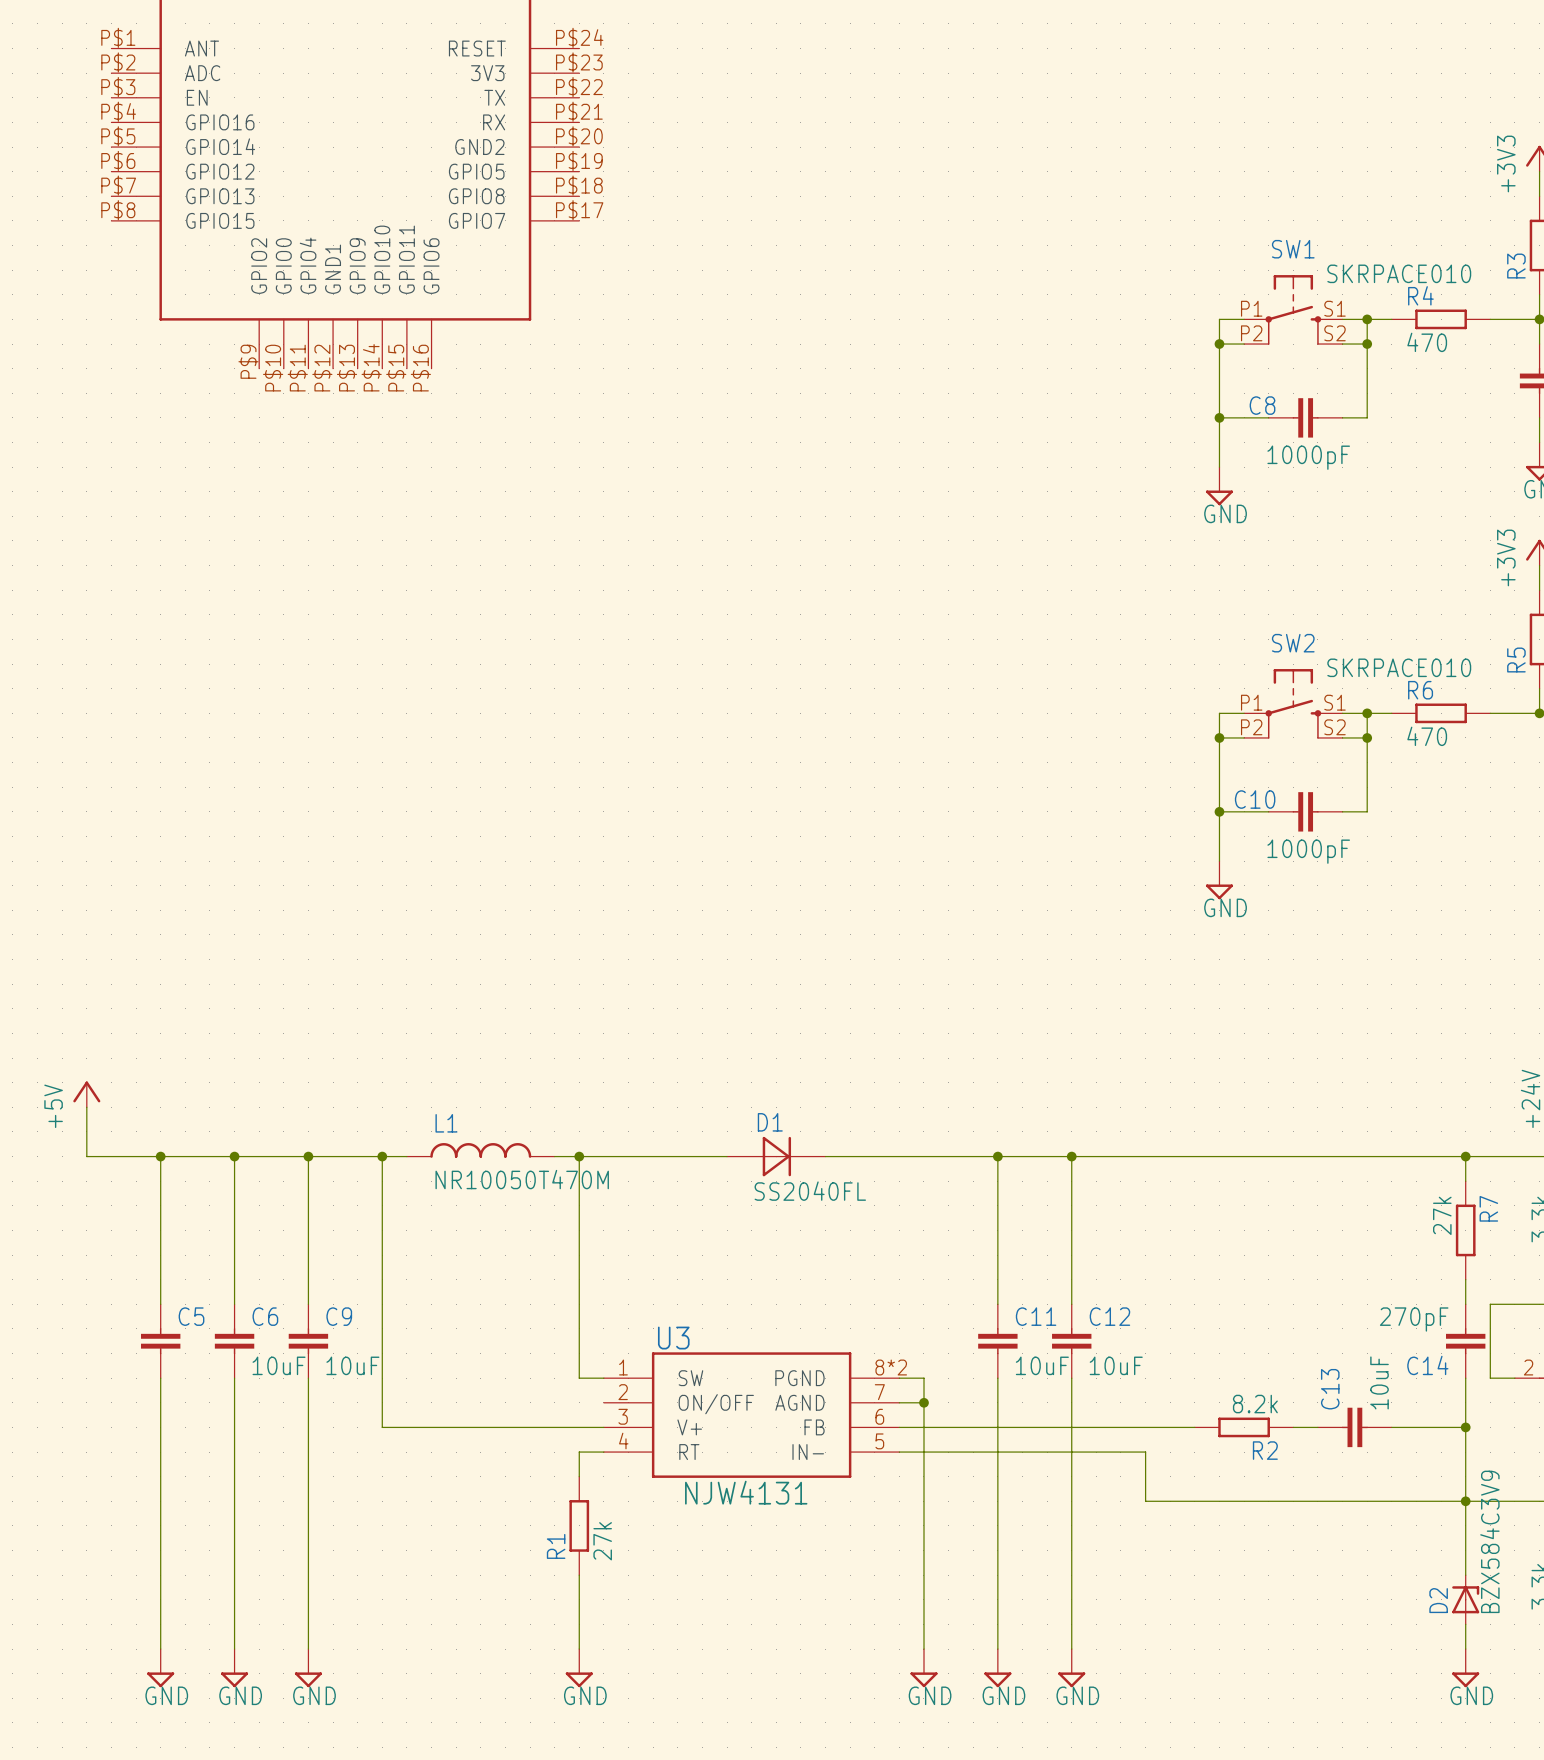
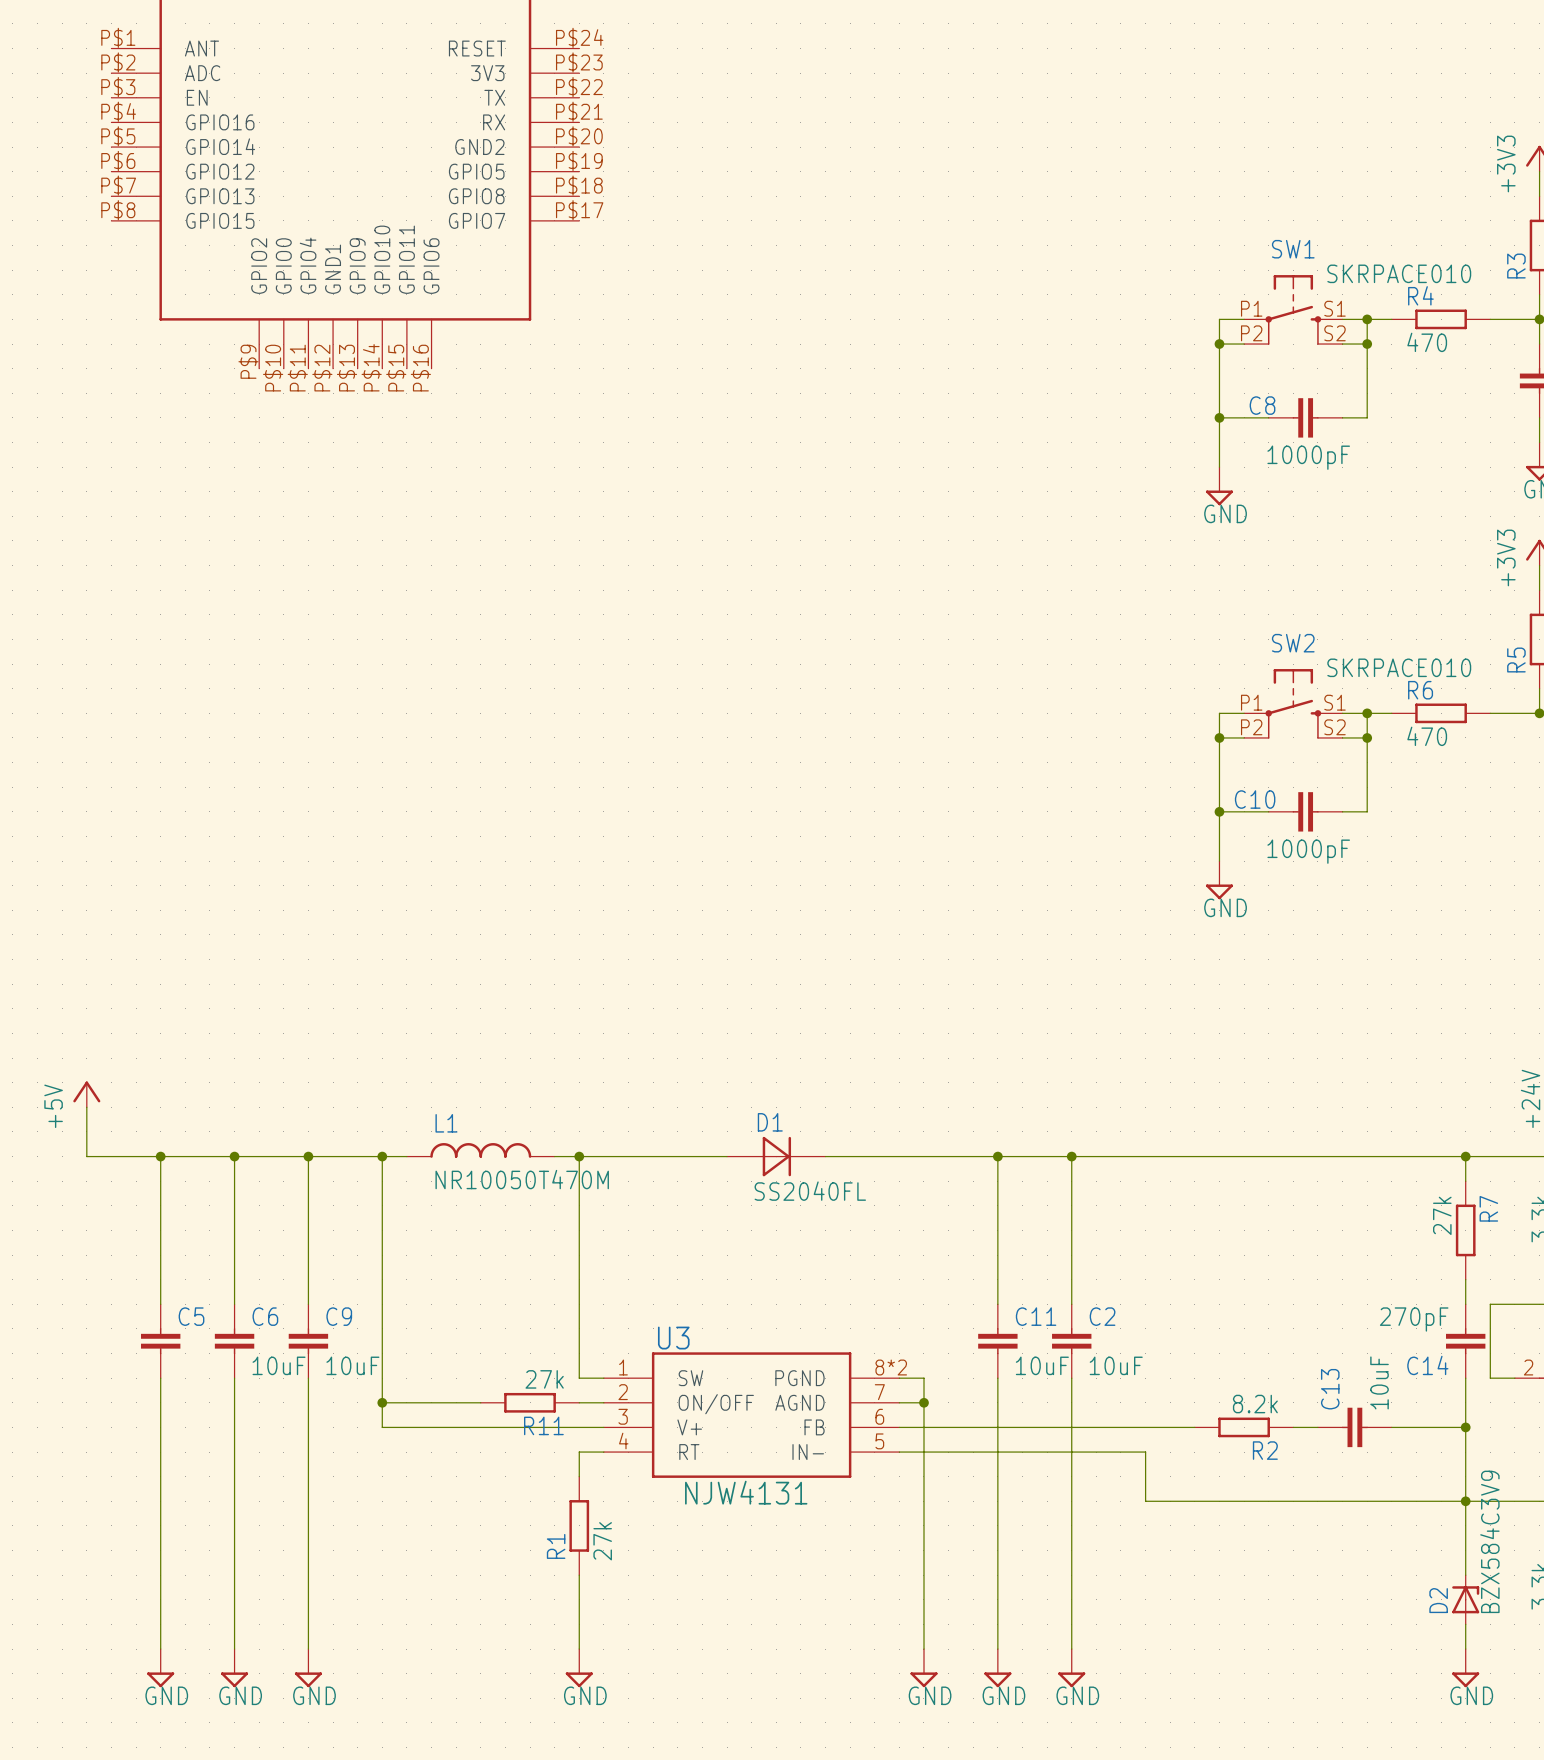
C12 name: C12 (1109, 1316) -> C2 (1102, 1316)
wire: none -> (382, 1402) (480, 1402)
junction: none -> (382, 1402)
R11: none -> 27k (530, 1402)
wire: none -> (579, 1402) (603, 1402)

